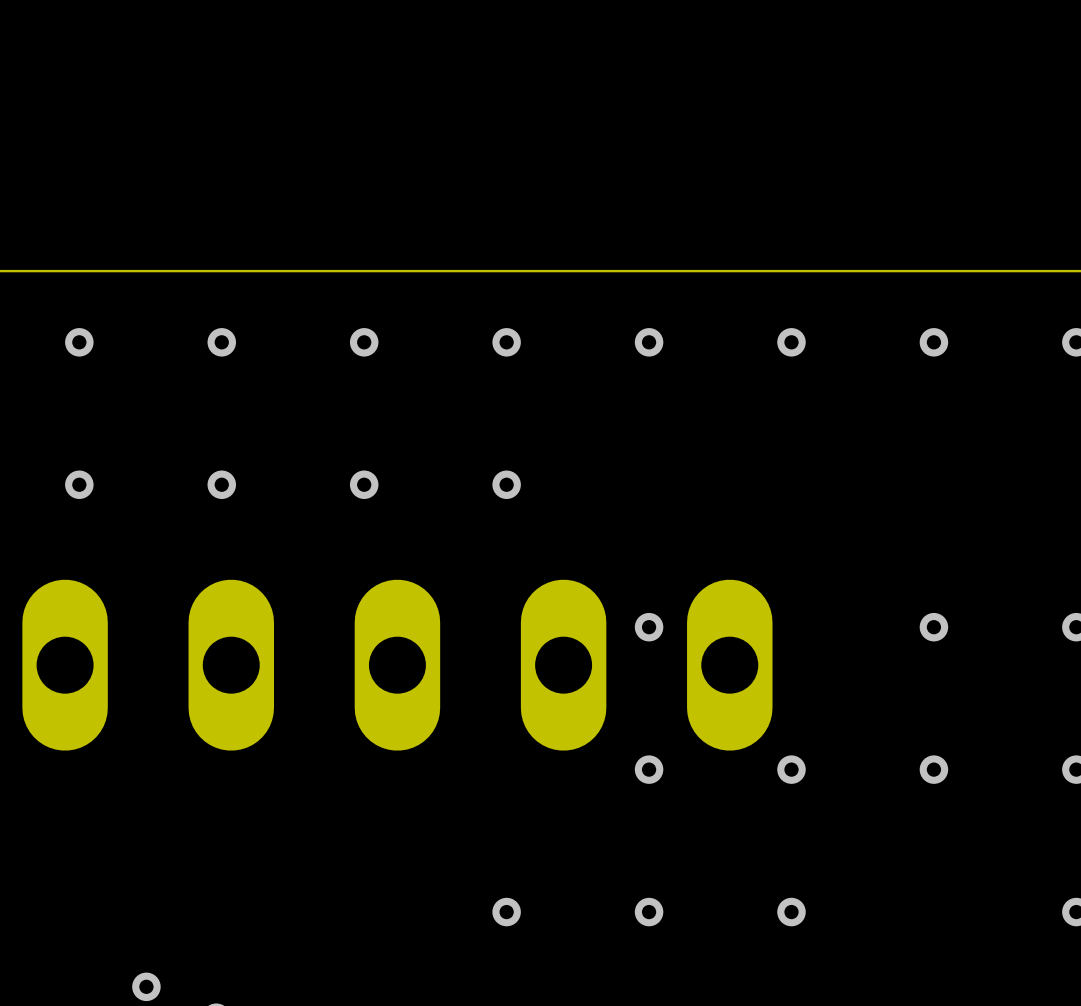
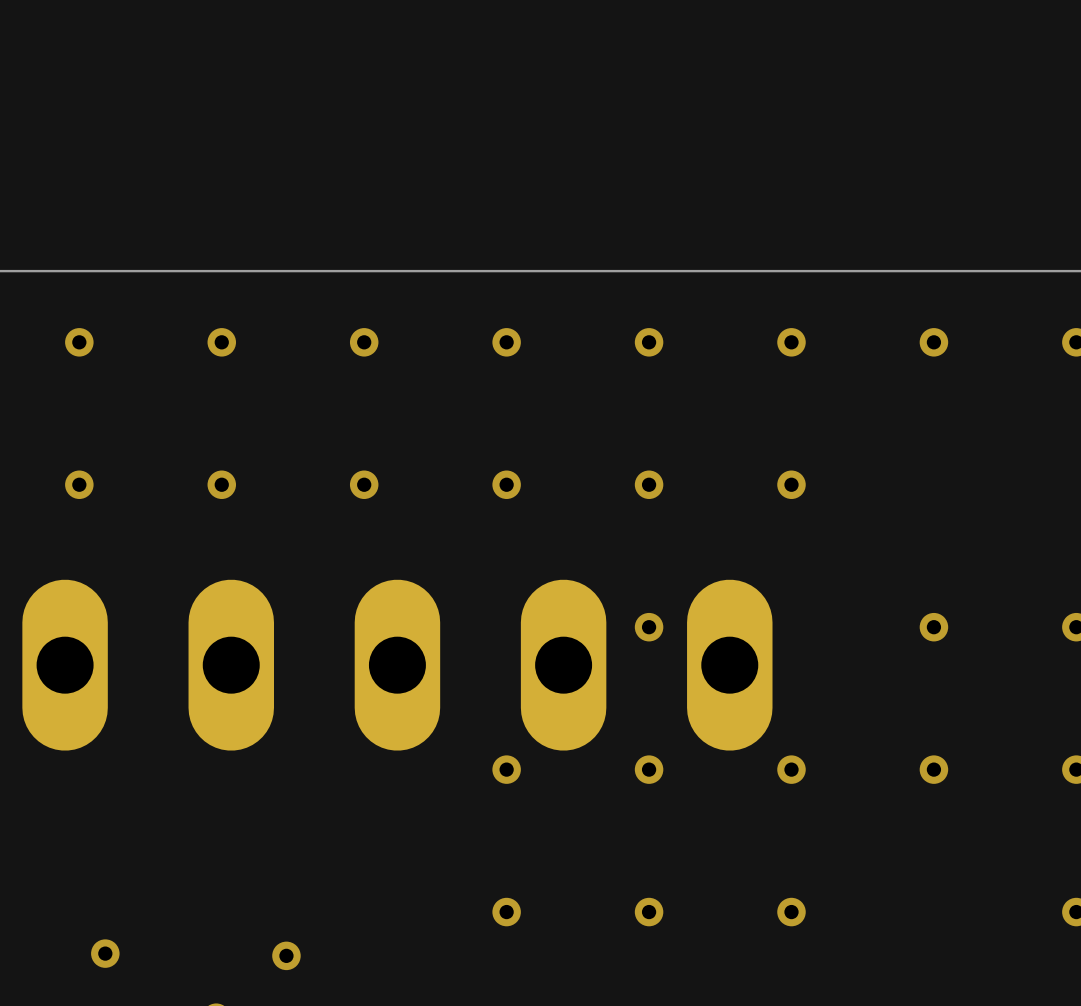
via: none -> (649, 484)
via: none -> (791, 484)
via: none -> (506, 769)
via: none -> (286, 955)
via position: (146, 986) -> (105, 953)

